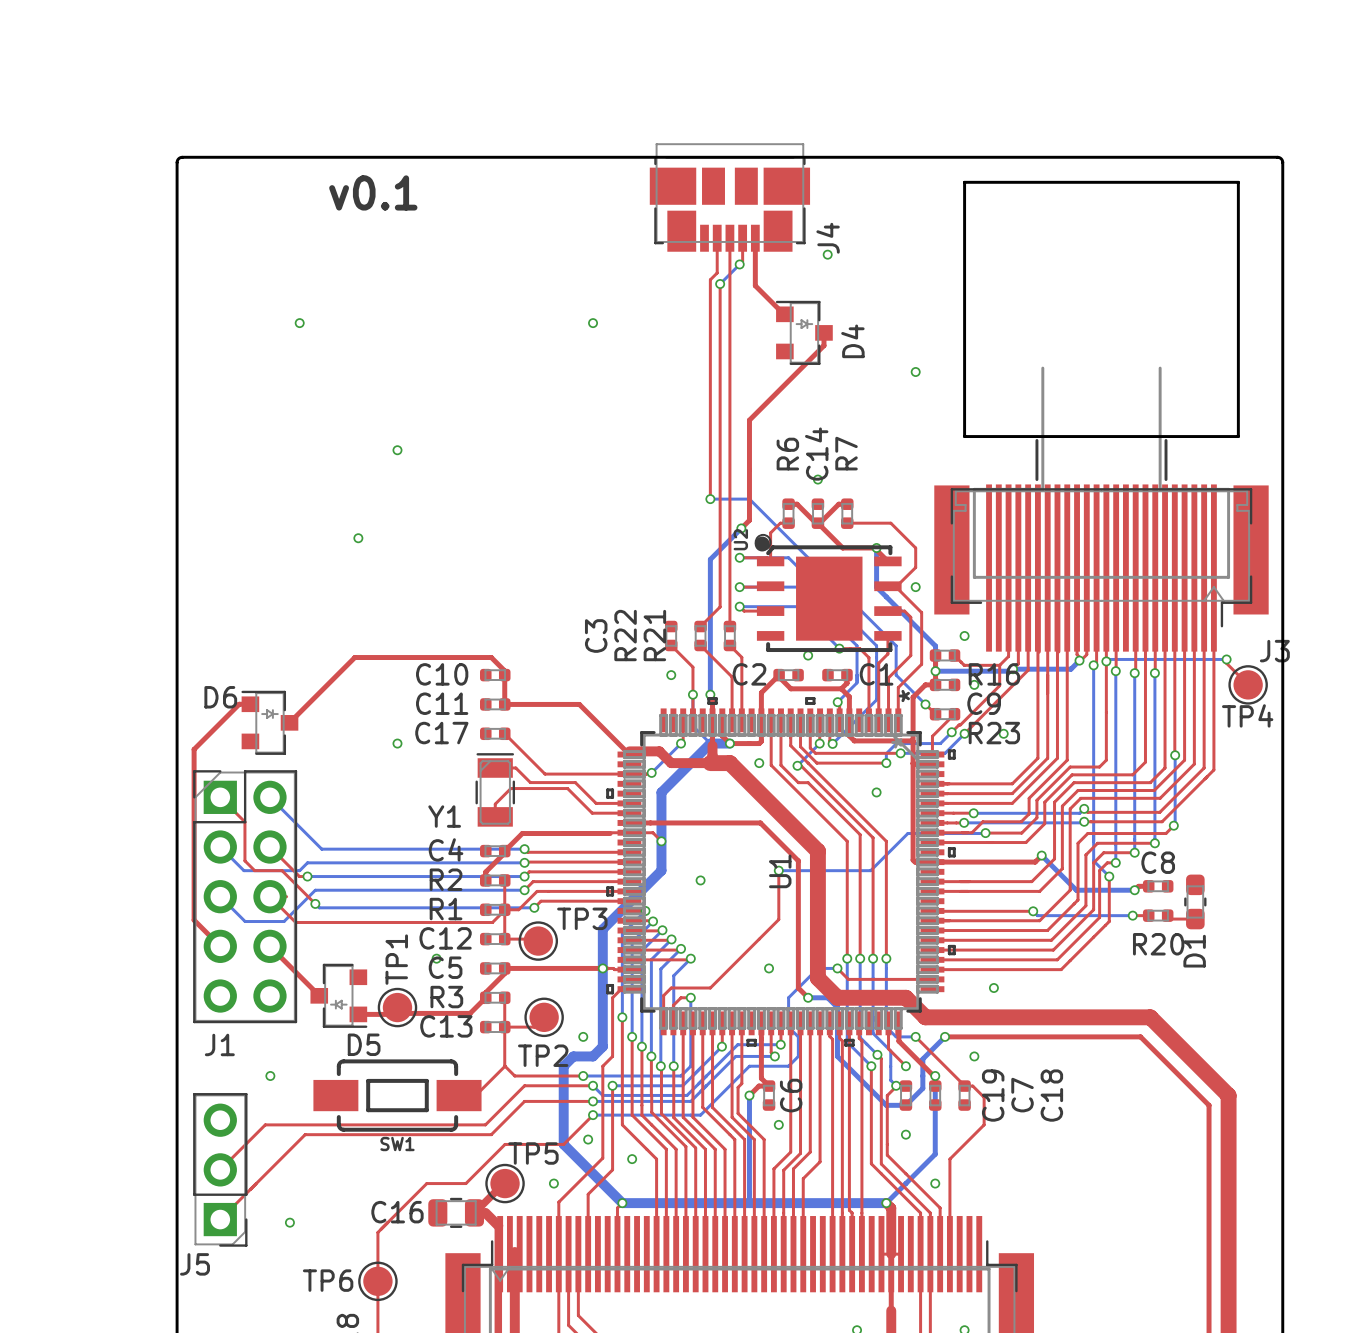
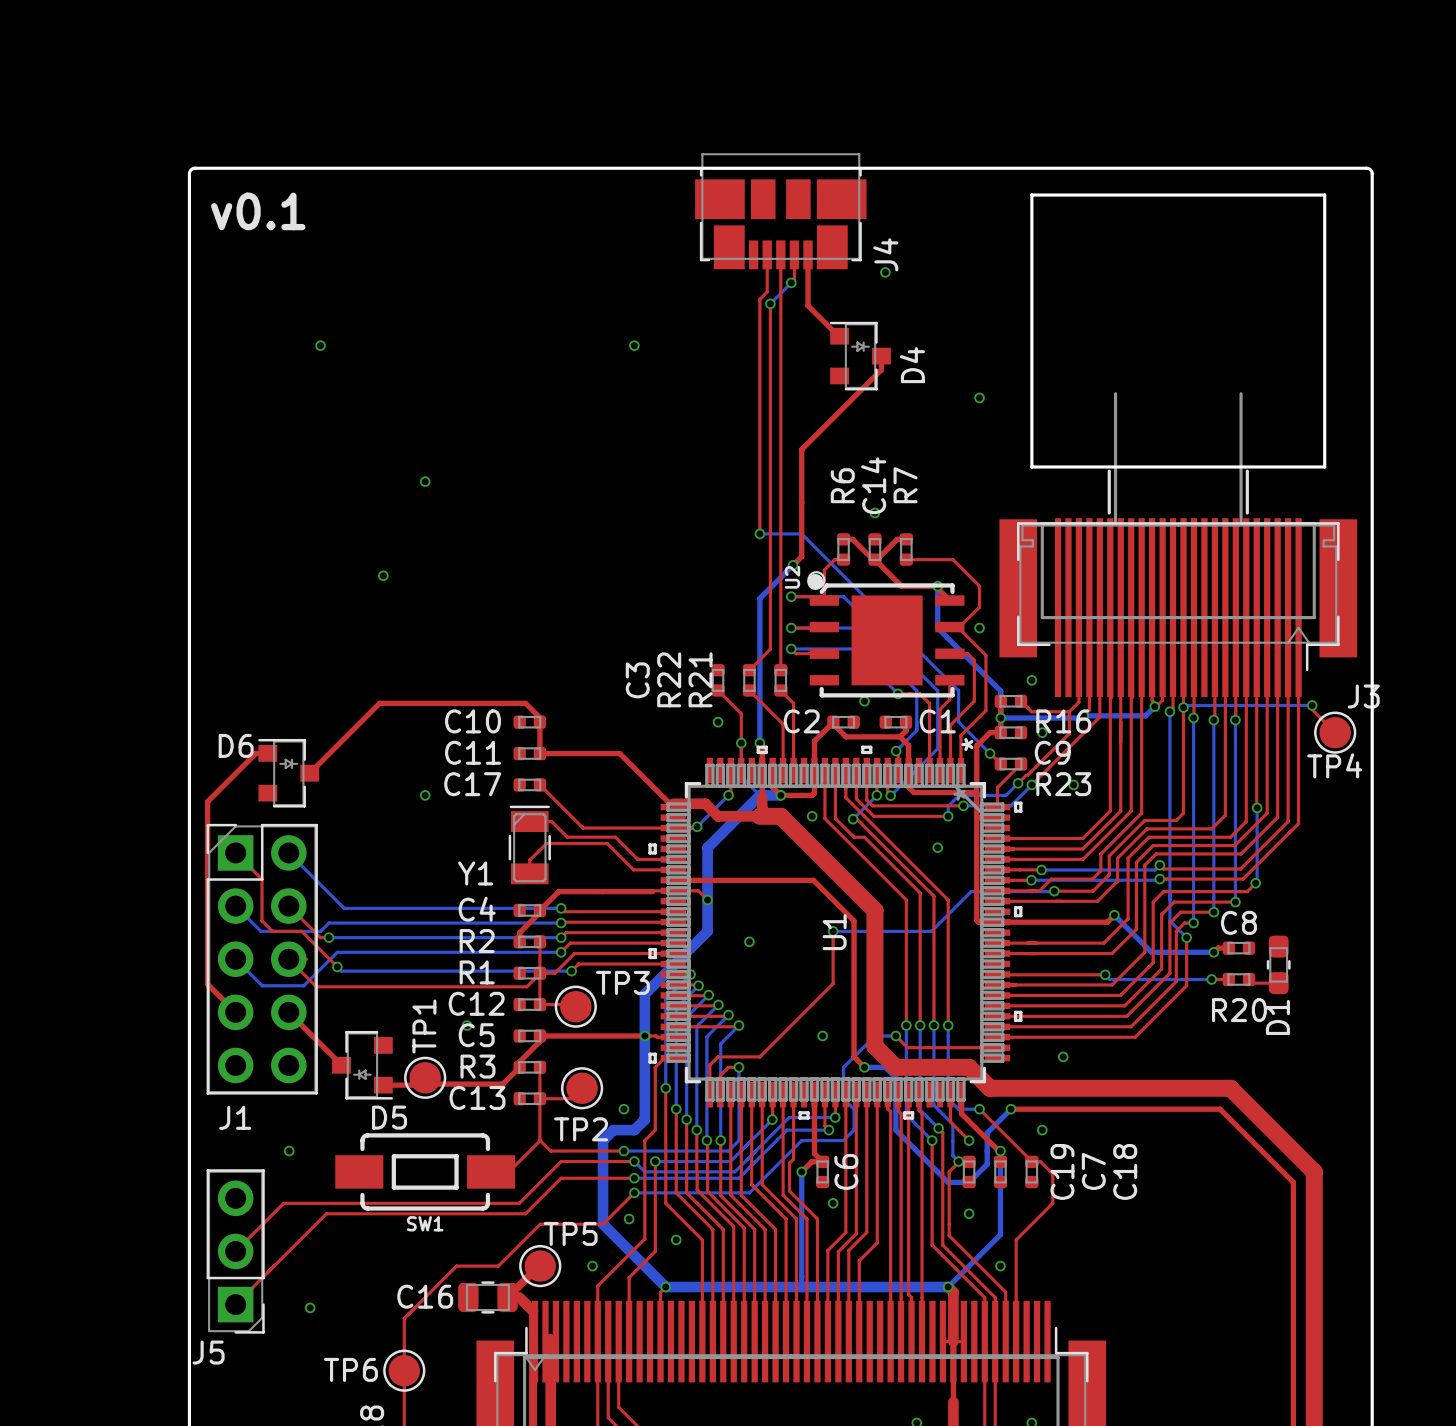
text position: v0.1 (373, 192) -> v0.1 (258, 211)

